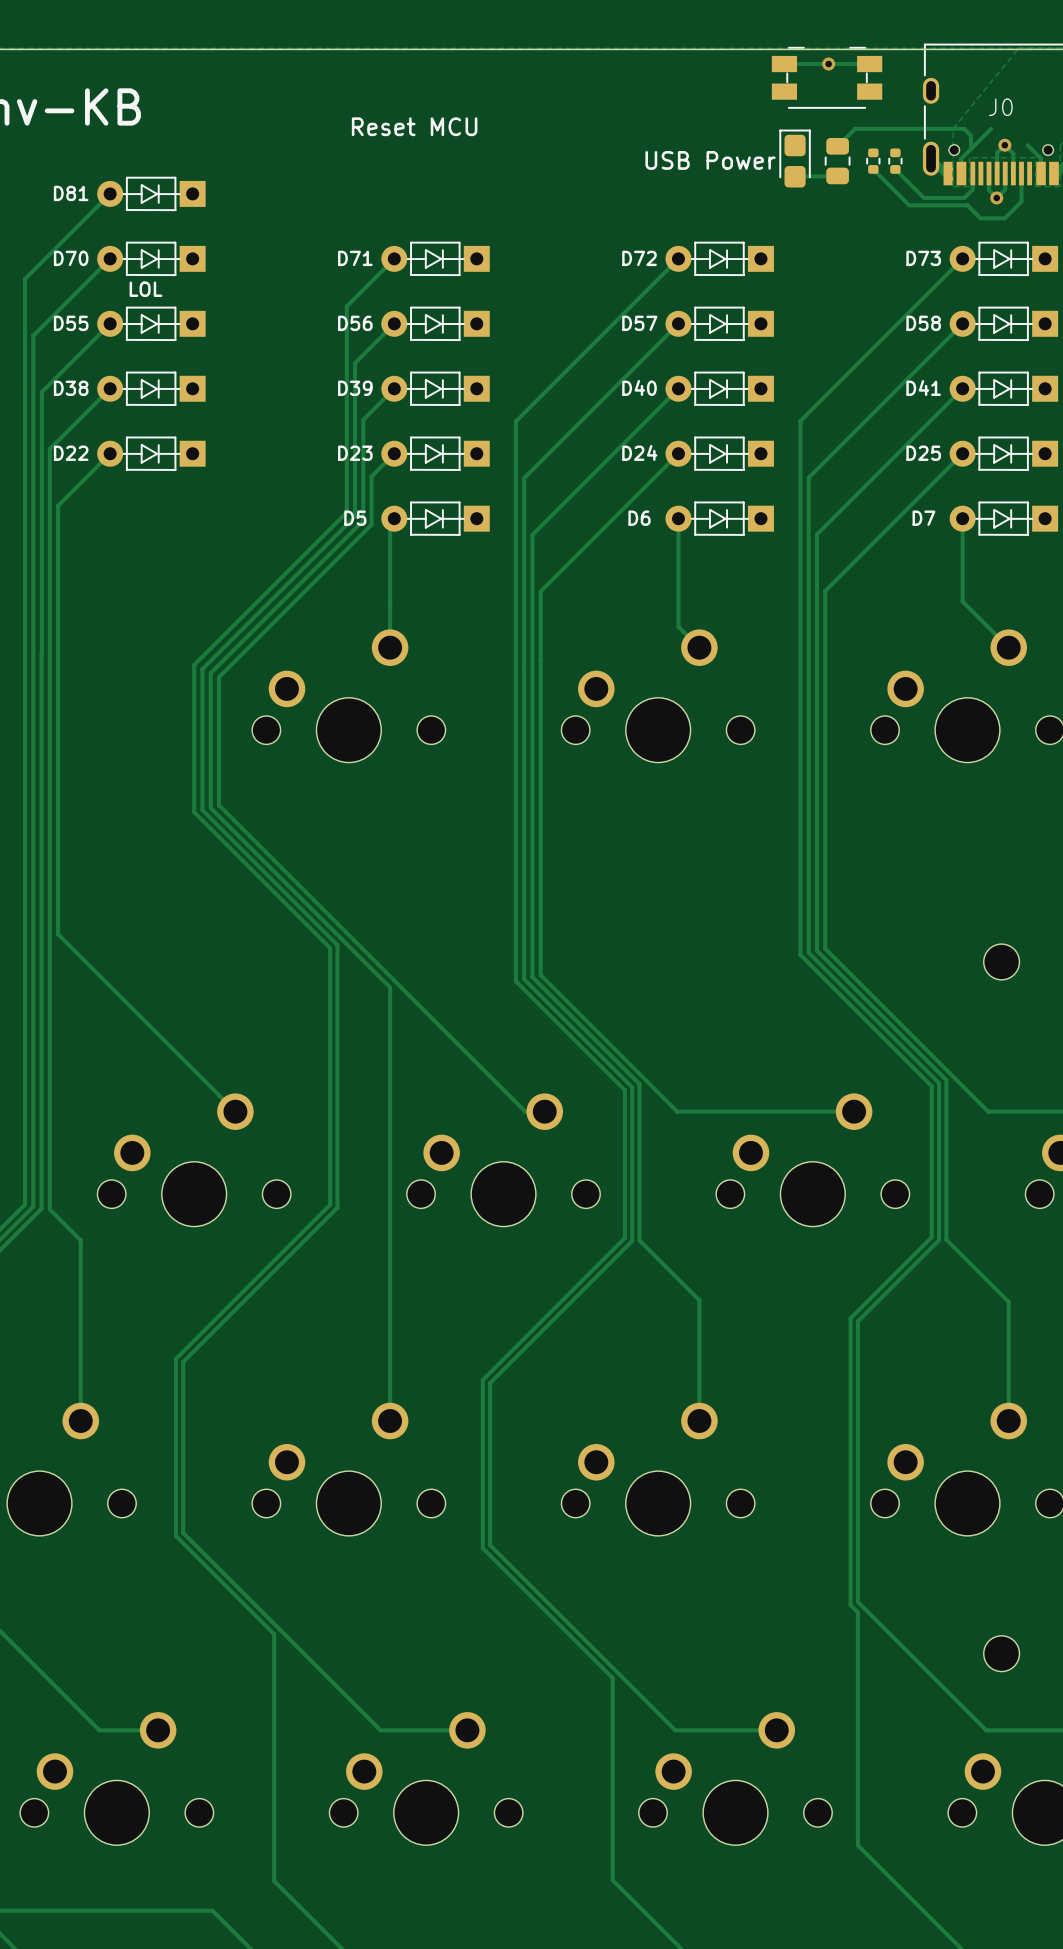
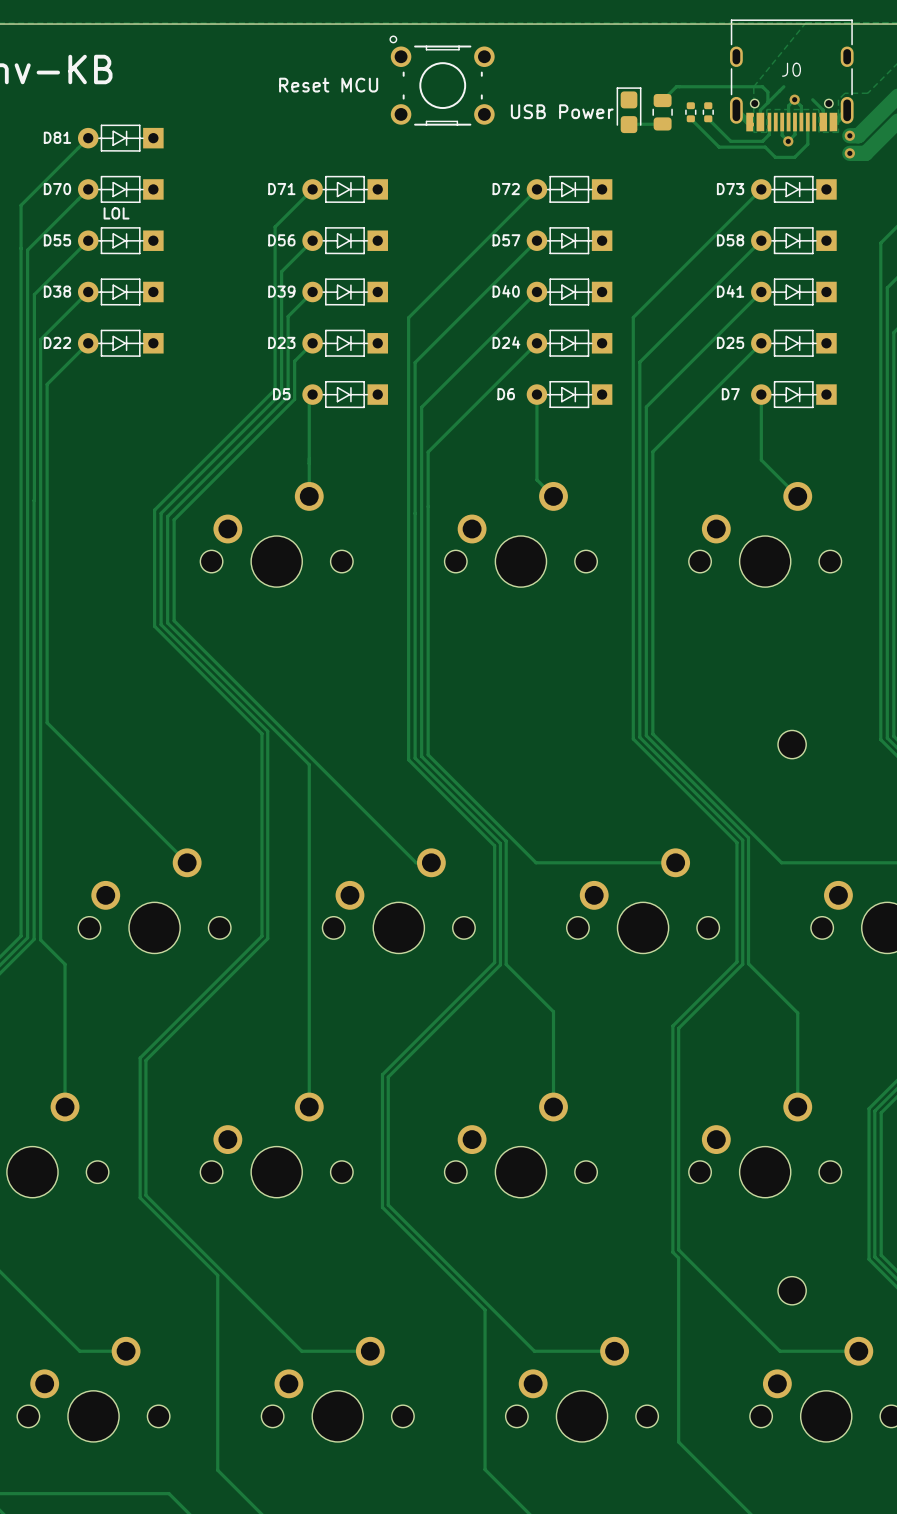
track: (784, 64) (869, 64) -> none
via: (828, 64) -> none
part: (827, 77) -> none
part: none -> (442, 80)

